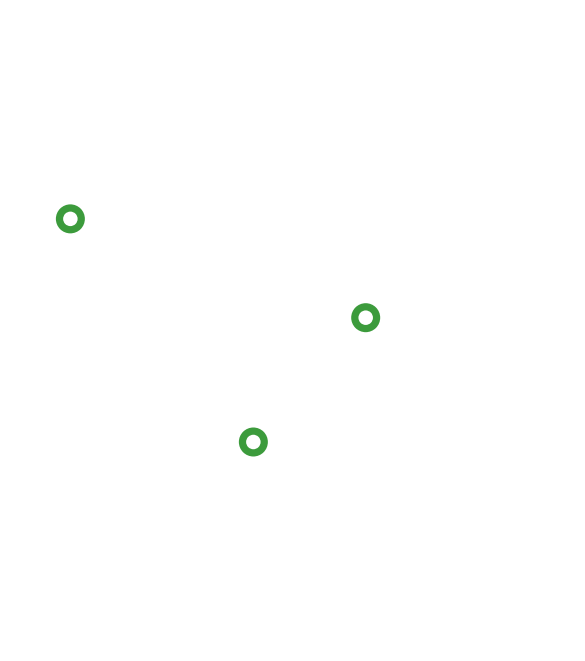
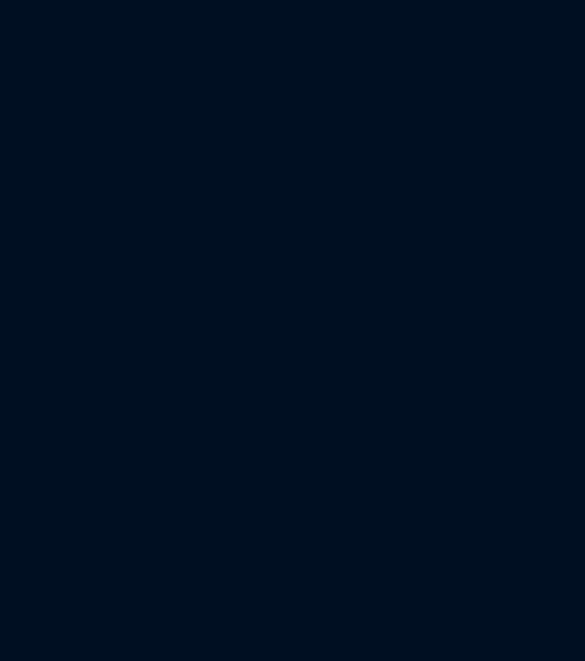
part: (70, 218) -> none
part: (365, 317) -> none
part: (253, 441) -> none

